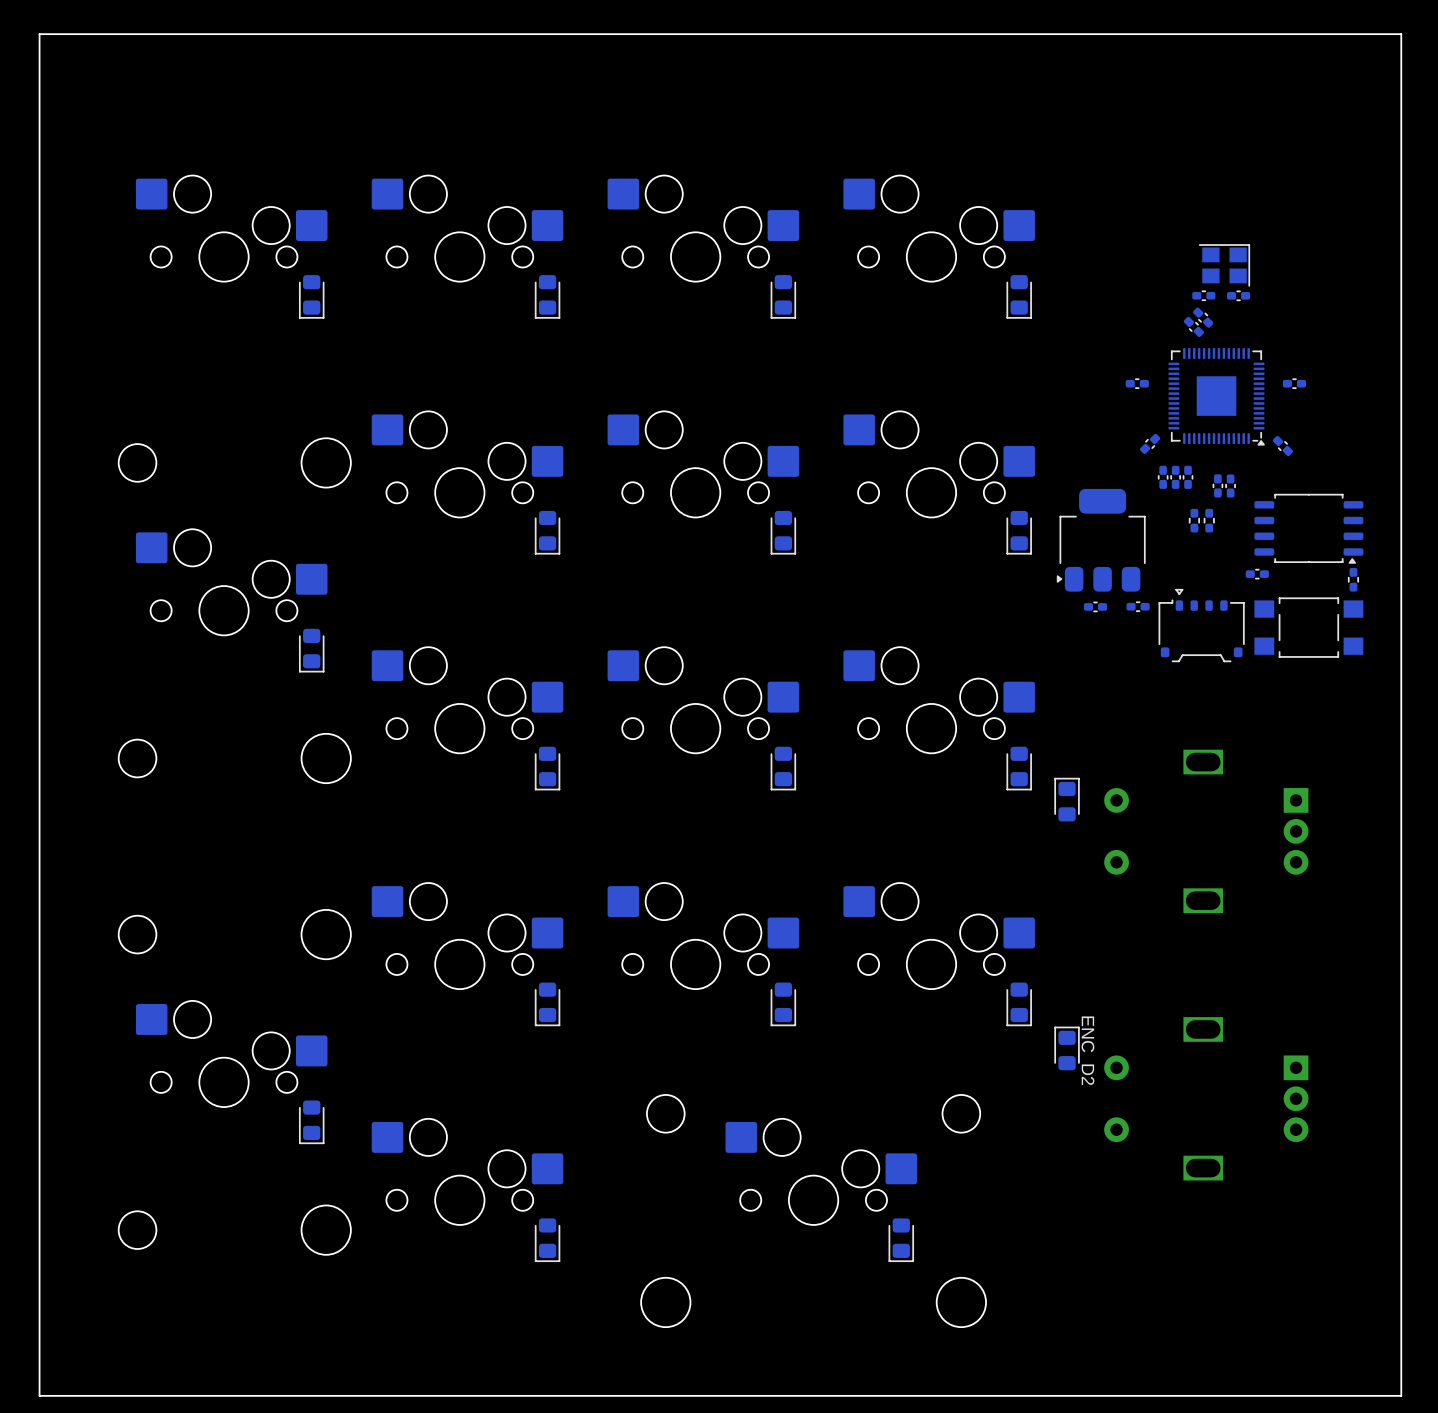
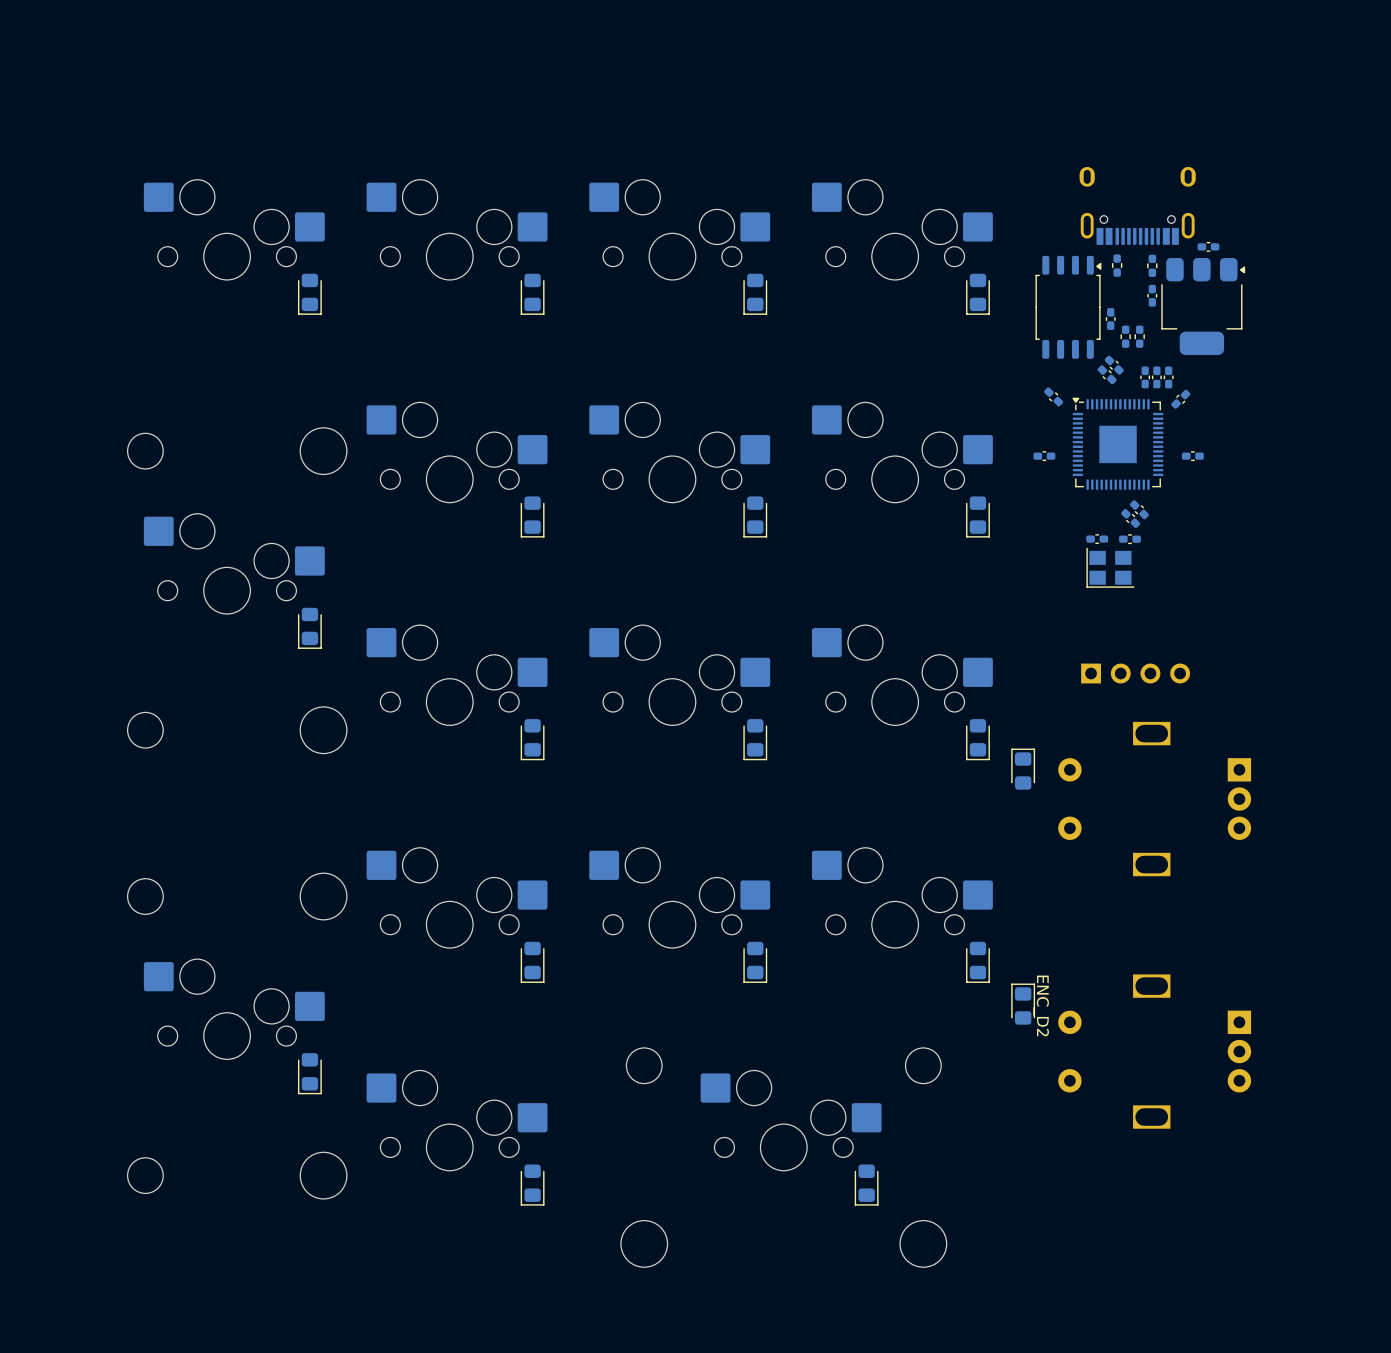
board edge: (1401, 34) (39, 34) (39, 1395) (1401, 1395) (1401, 34) -> none
part: none -> (1137, 205)
part: none -> (1208, 246)
part: (1224, 265) -> none
part: none -> (1117, 265)
part: none -> (1152, 265)
part rotation: 0° (1203, 295) -> 90° clockwise (1152, 295)
part: (1238, 295) -> none
part: (1203, 317) -> none
part: none -> (1110, 319)
part: (1193, 326) -> none
part: none -> (1125, 336)
part: none -> (1139, 336)
part: none -> (1114, 365)
part: none -> (1107, 374)
part: (1137, 383) -> none
part: (1294, 383) -> none
part: none -> (1145, 377)
part: none -> (1156, 377)
part: none -> (1168, 377)
part rotation: 0° (1216, 396) -> 180° (1117, 443)
part position: (1216, 396) -> (1117, 443)
part: none -> (1053, 396)
part: none -> (1180, 399)
part: (1150, 443) -> none
part: (1282, 446) -> none
part: none -> (1044, 456)
part: none -> (1192, 456)
part: (1163, 477) -> none
part: (1175, 477) -> none
part: (1188, 477) -> none
part: (1217, 485) -> none
part: (1230, 485) -> none
part footprint: [1188, 508, 1200, 533] -> [1129, 500, 1149, 520]
part: (1209, 520) -> none
part rotation: 0° (1308, 528) -> 90° counterclockwise (1068, 307)
part position: (1308, 528) -> (1068, 307)
part: none -> (1130, 518)
part rotation: 0° (1101, 540) -> 180° (1203, 306)
part position: (1101, 540) -> (1203, 306)
part: none -> (1097, 539)
part: none -> (1129, 539)
part: (1257, 574) -> none
part: (1353, 579) -> none
part: none -> (1110, 567)
part: (1095, 606) -> none
part: (1138, 606) -> none
part: (1201, 625) -> none
part: (1308, 627) -> none
part: none -> (1135, 673)

